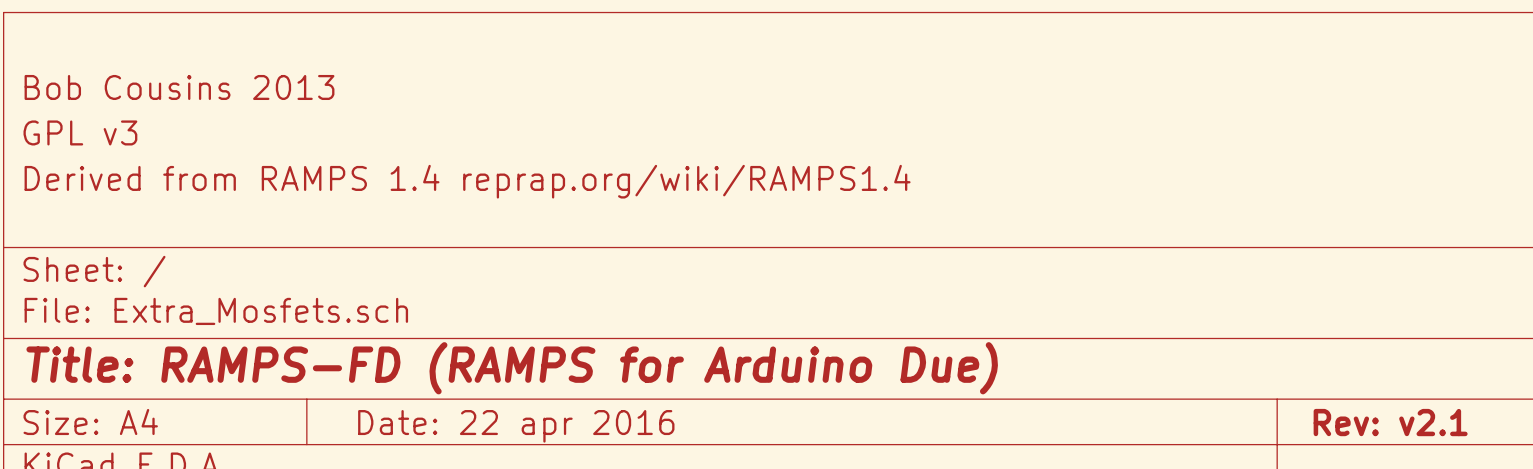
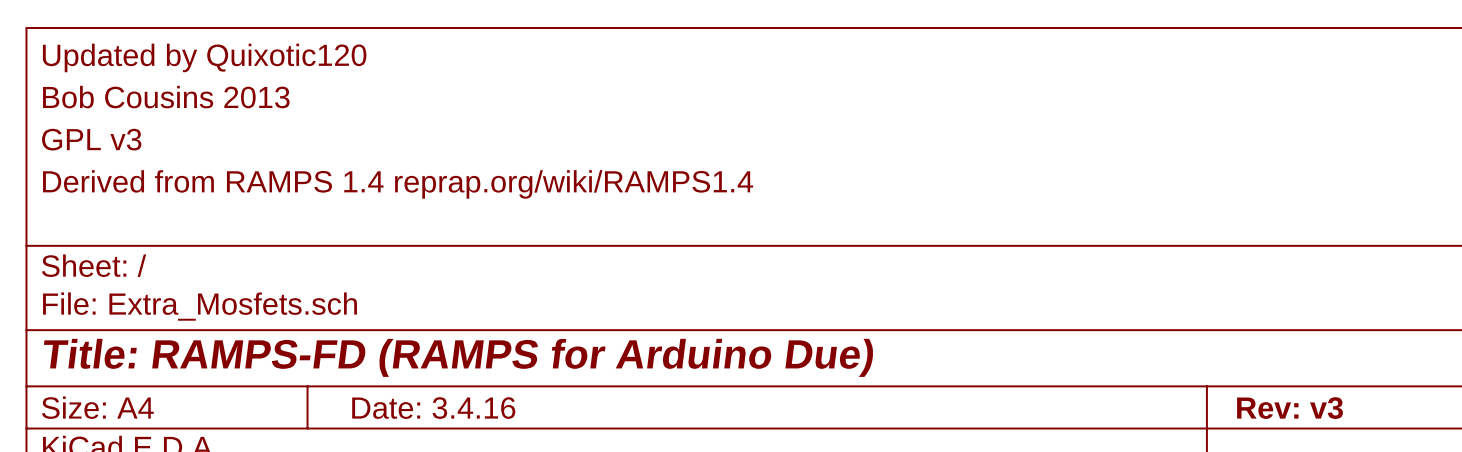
title block: none -> Updated by Quixotic120 (204, 57)
title block: Rev: v2.1 (1390, 422) -> Rev: v3 (1290, 408)
title block: Date: 22 apr 2016 (516, 426) -> Date: 3.4.16 (433, 408)

